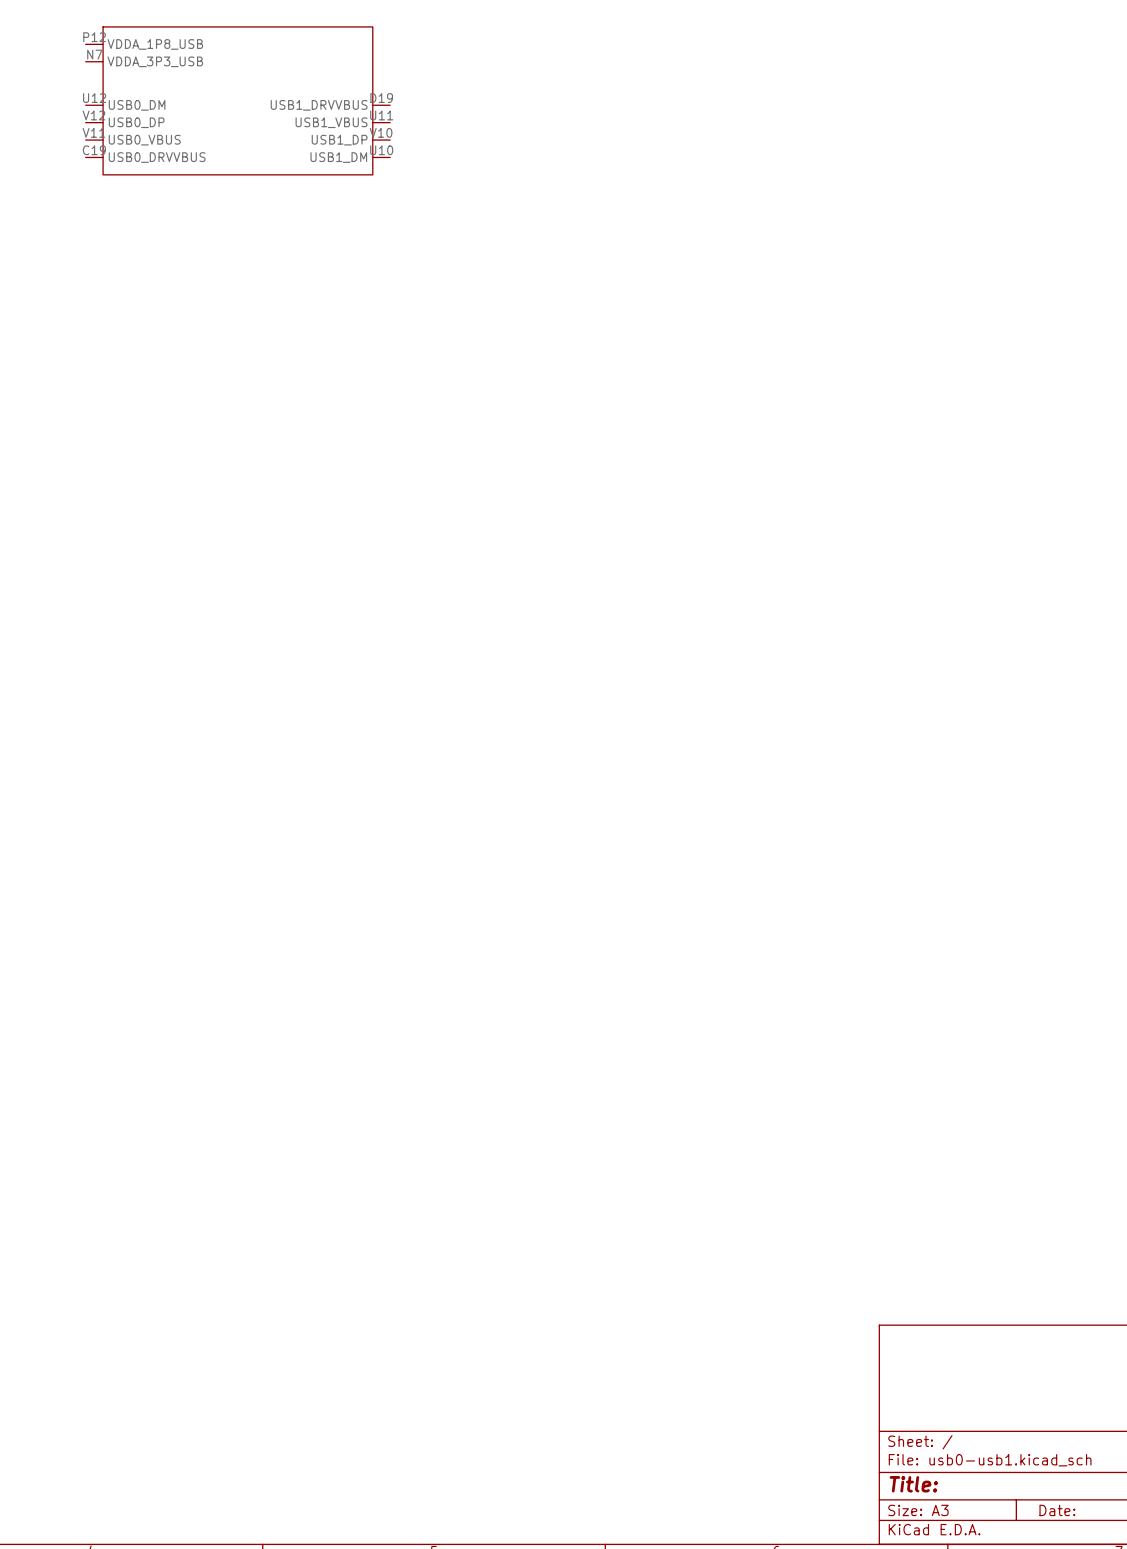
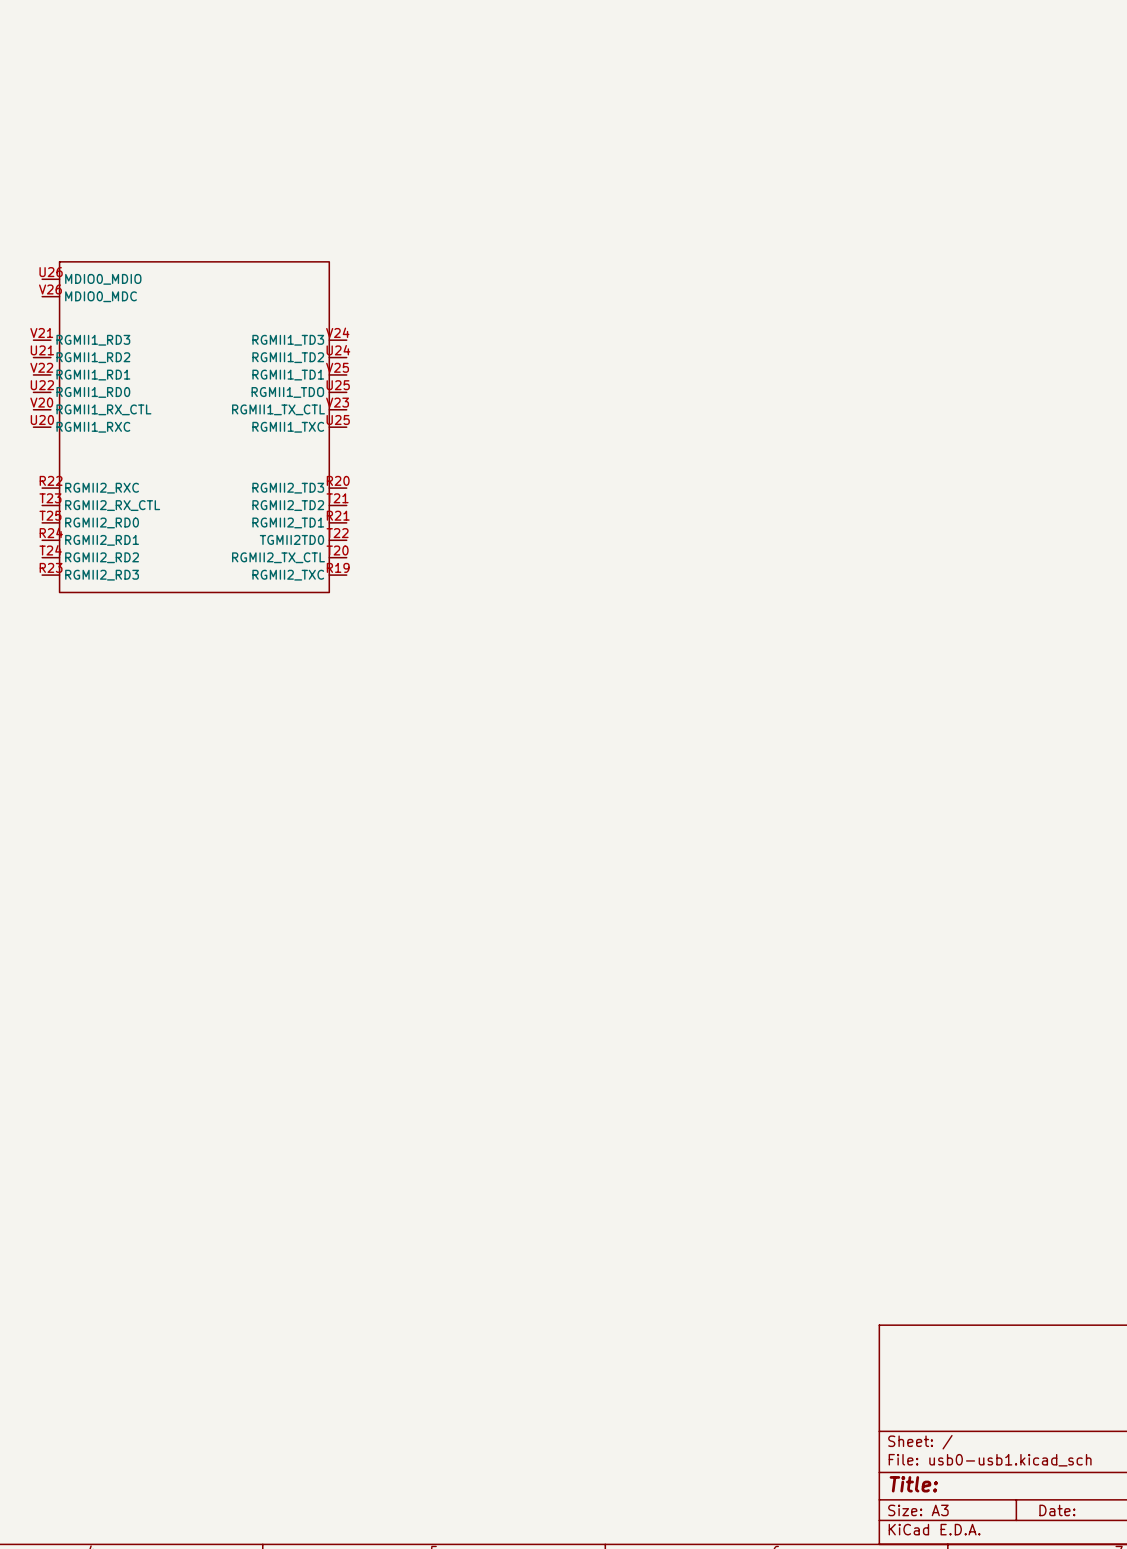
part: (237, 100) -> none
part: none -> (190, 427)

